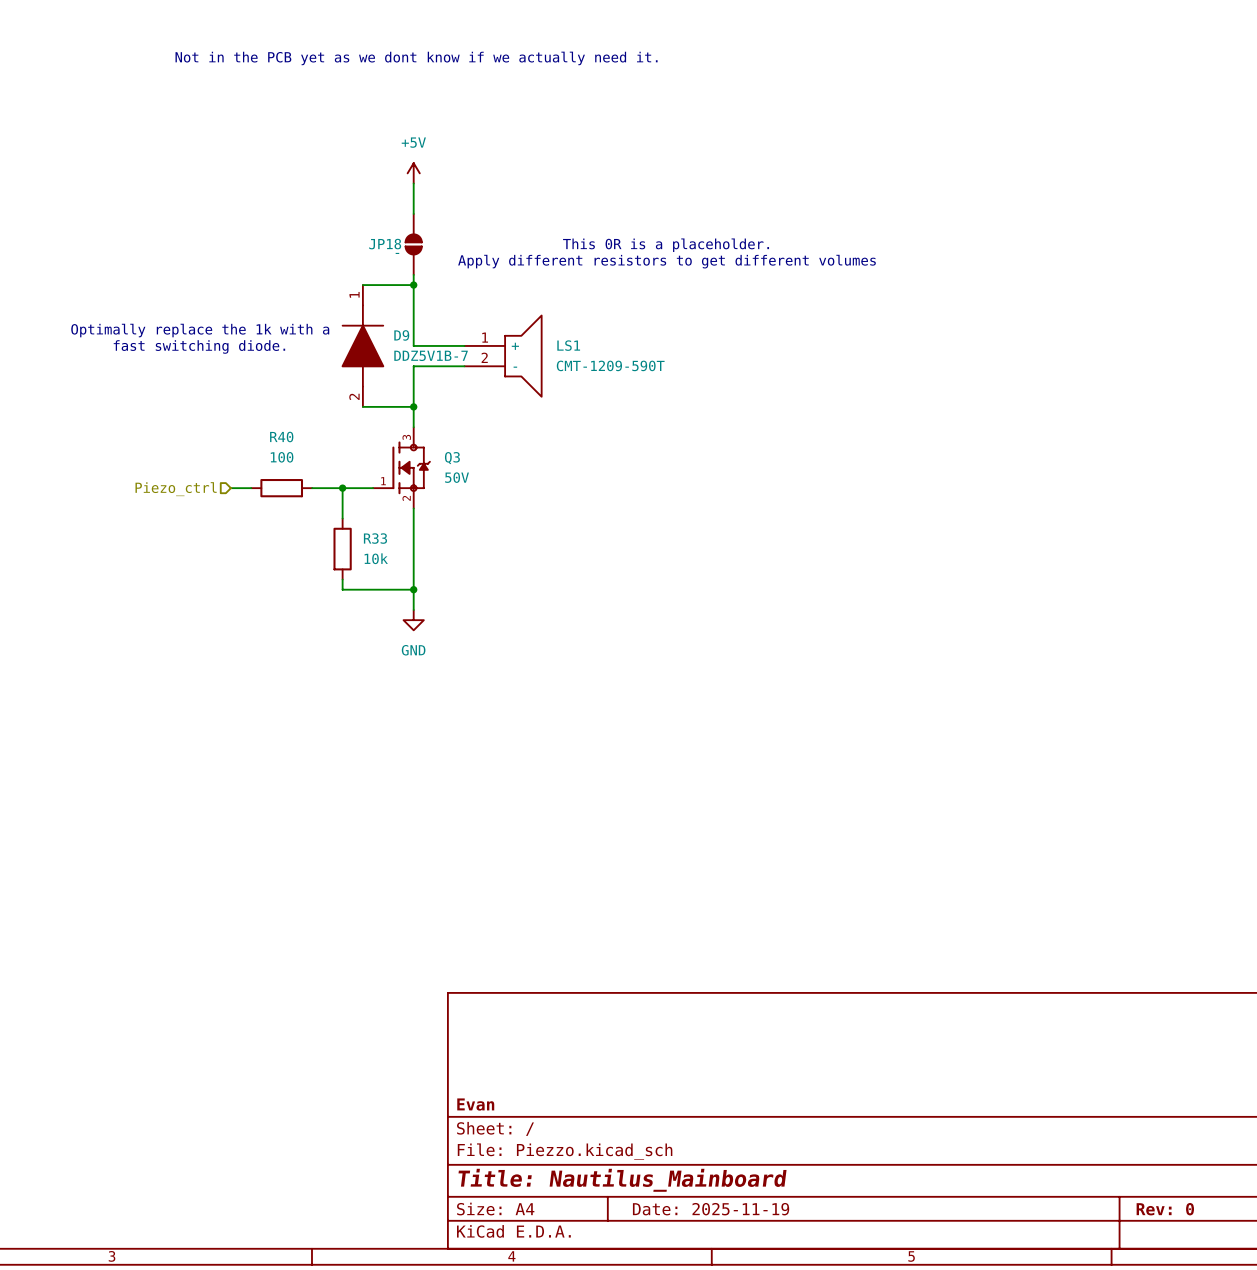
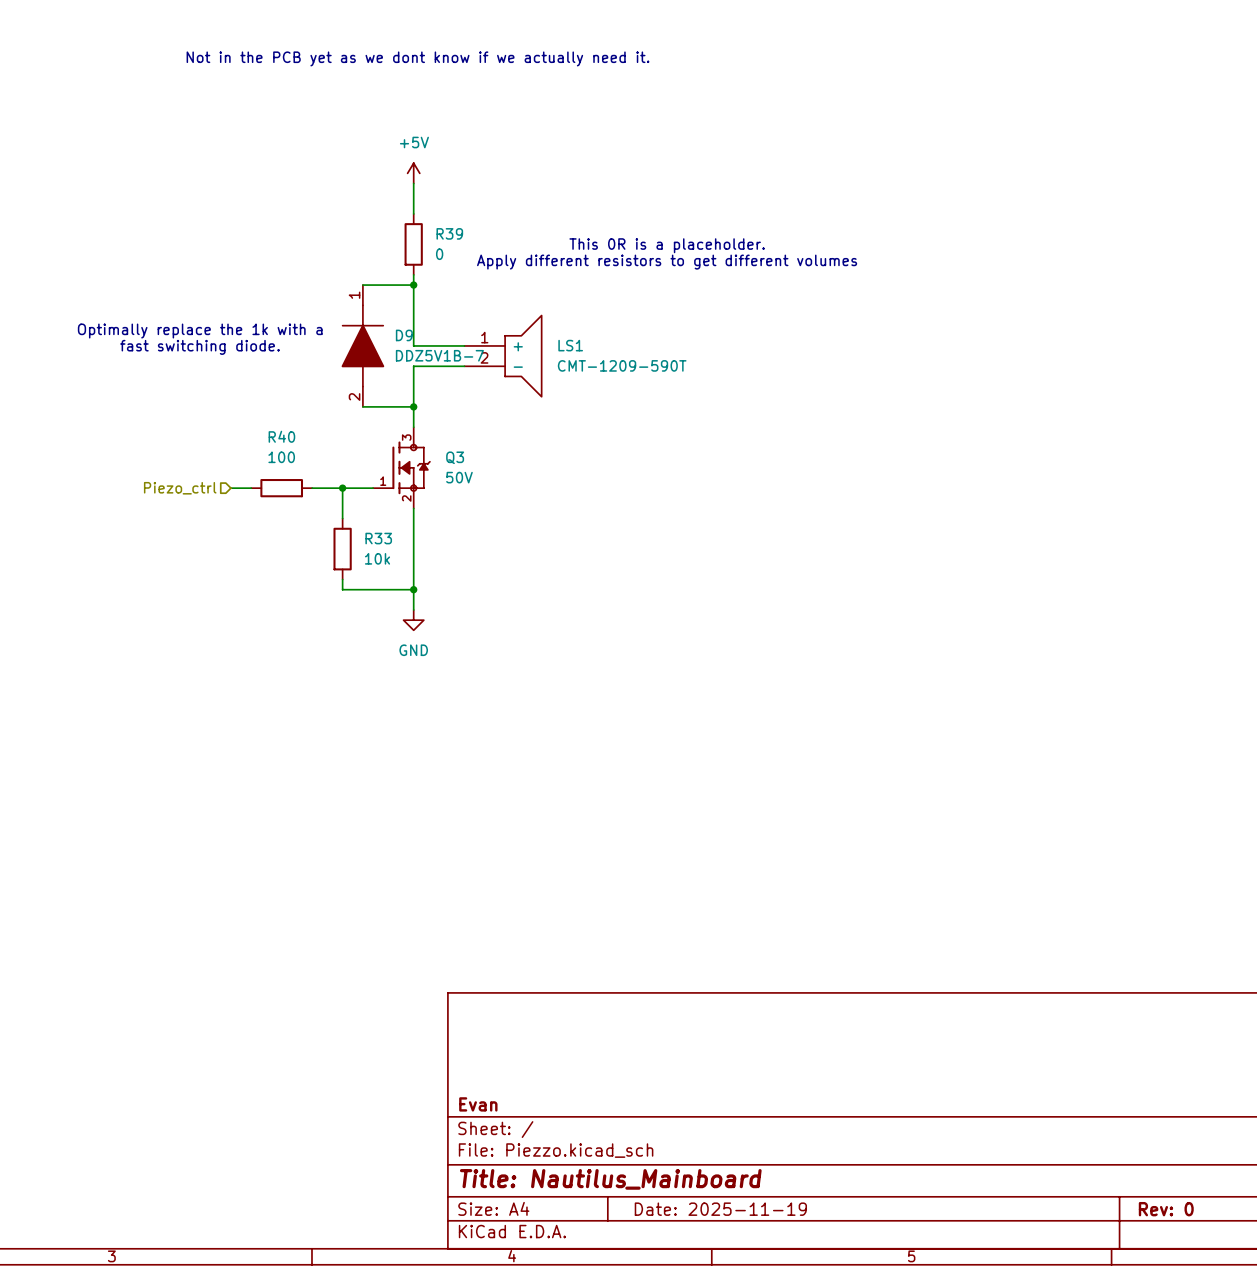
JP18: - (413, 244) -> none
R39: none -> 0 (413, 244)

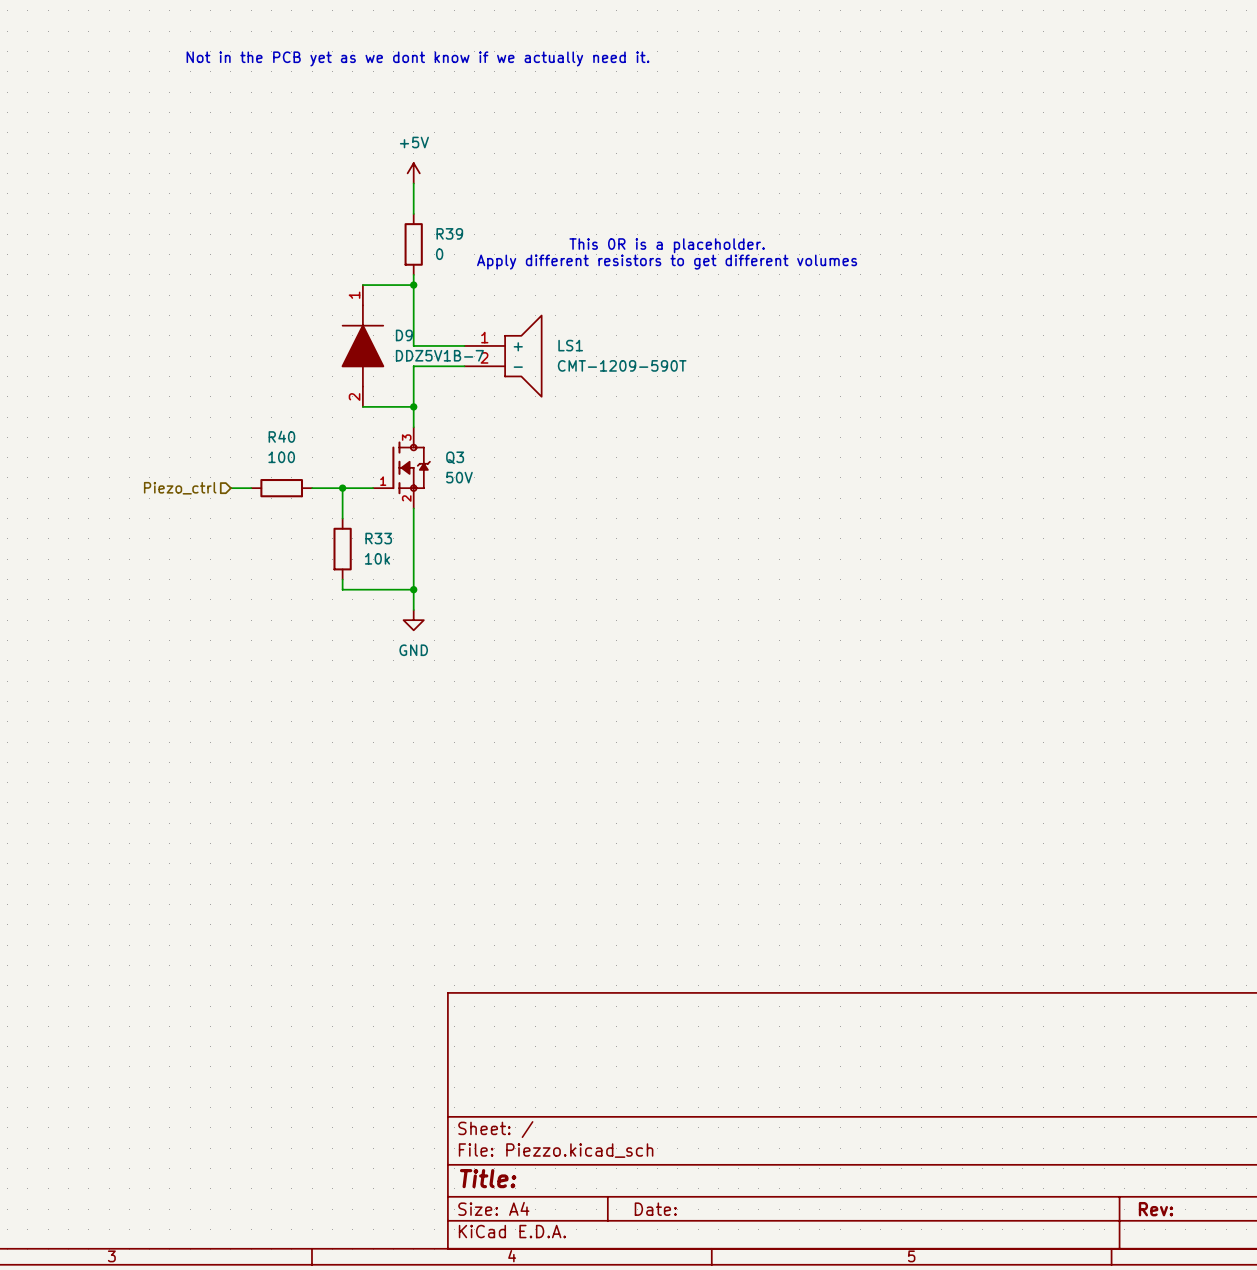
text: Optimally replace the 1k with a (200, 331) -> none
text: fast switching diode. (199, 347) -> none
title block: Evan (478, 1104) -> none
title block: Title: Nautilus_Mainboard (610, 1179) -> Title: (488, 1178)
title block: Date: 2025-11-19 (720, 1209) -> Date: (655, 1209)
title block: Rev: 0 (1166, 1209) -> Rev: (1155, 1209)

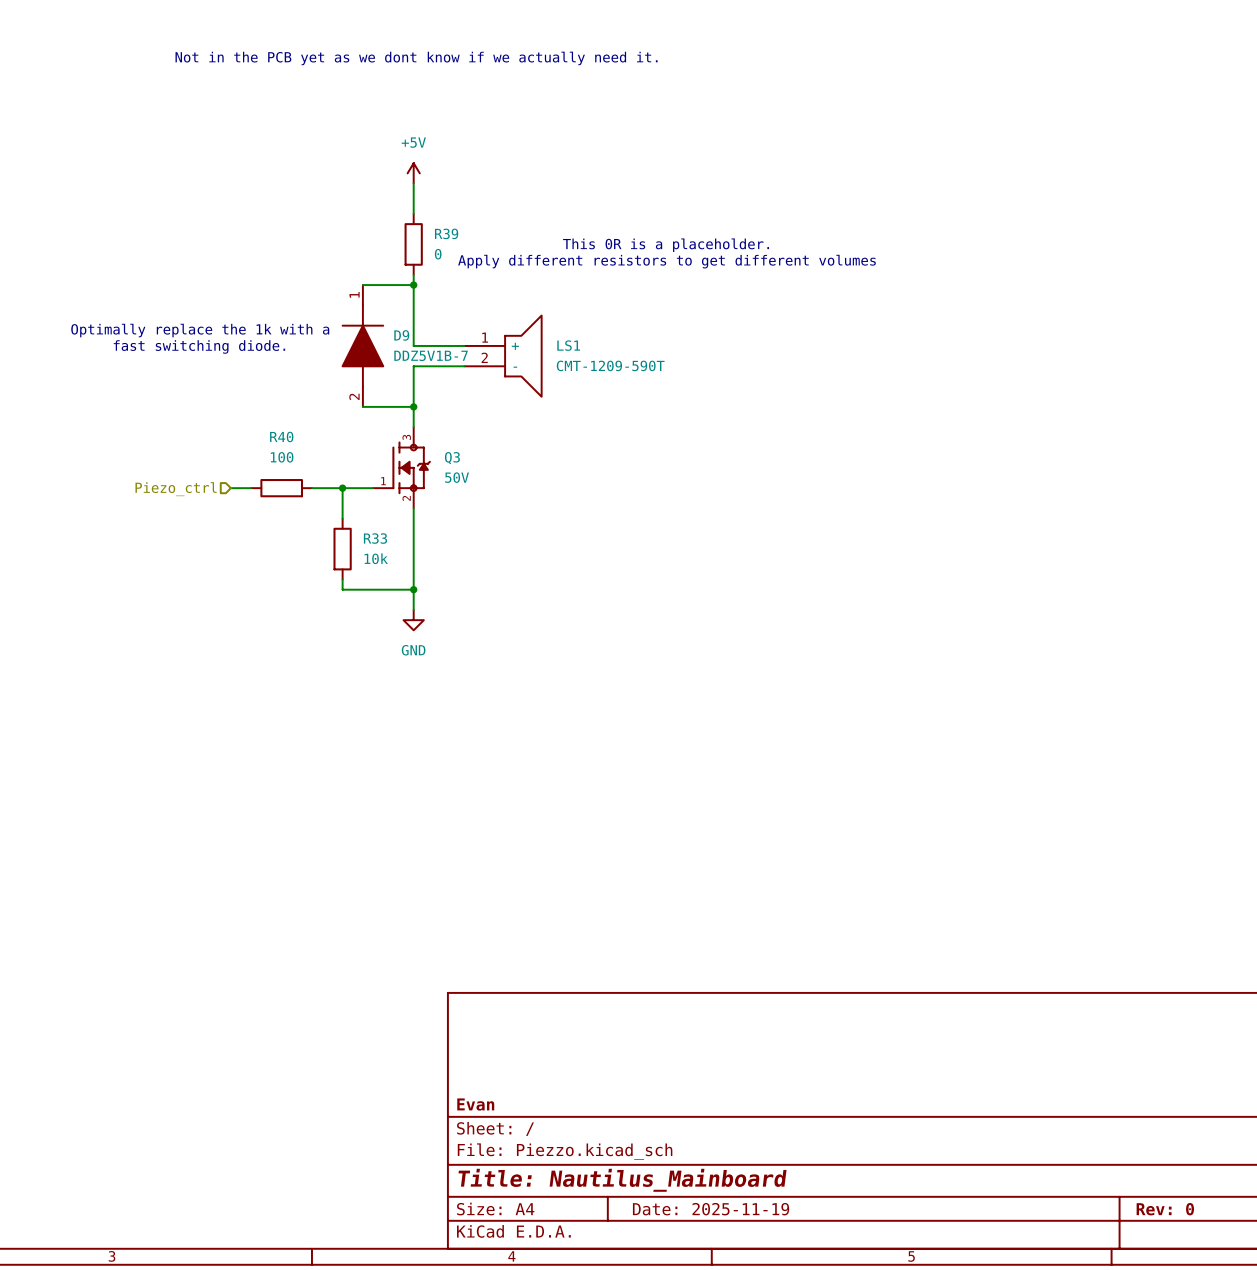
text: none -> Optimally replace the 1k with a (200, 330)
text: none -> fast switching diode. (199, 346)
title block: none -> Evan (475, 1104)
title block: Title: (488, 1178) -> Title: Nautilus_Mainboard (622, 1180)
title block: Date: (655, 1209) -> Date: 2025-11-19 (711, 1209)
title block: Rev: (1155, 1209) -> Rev: 0 (1165, 1209)

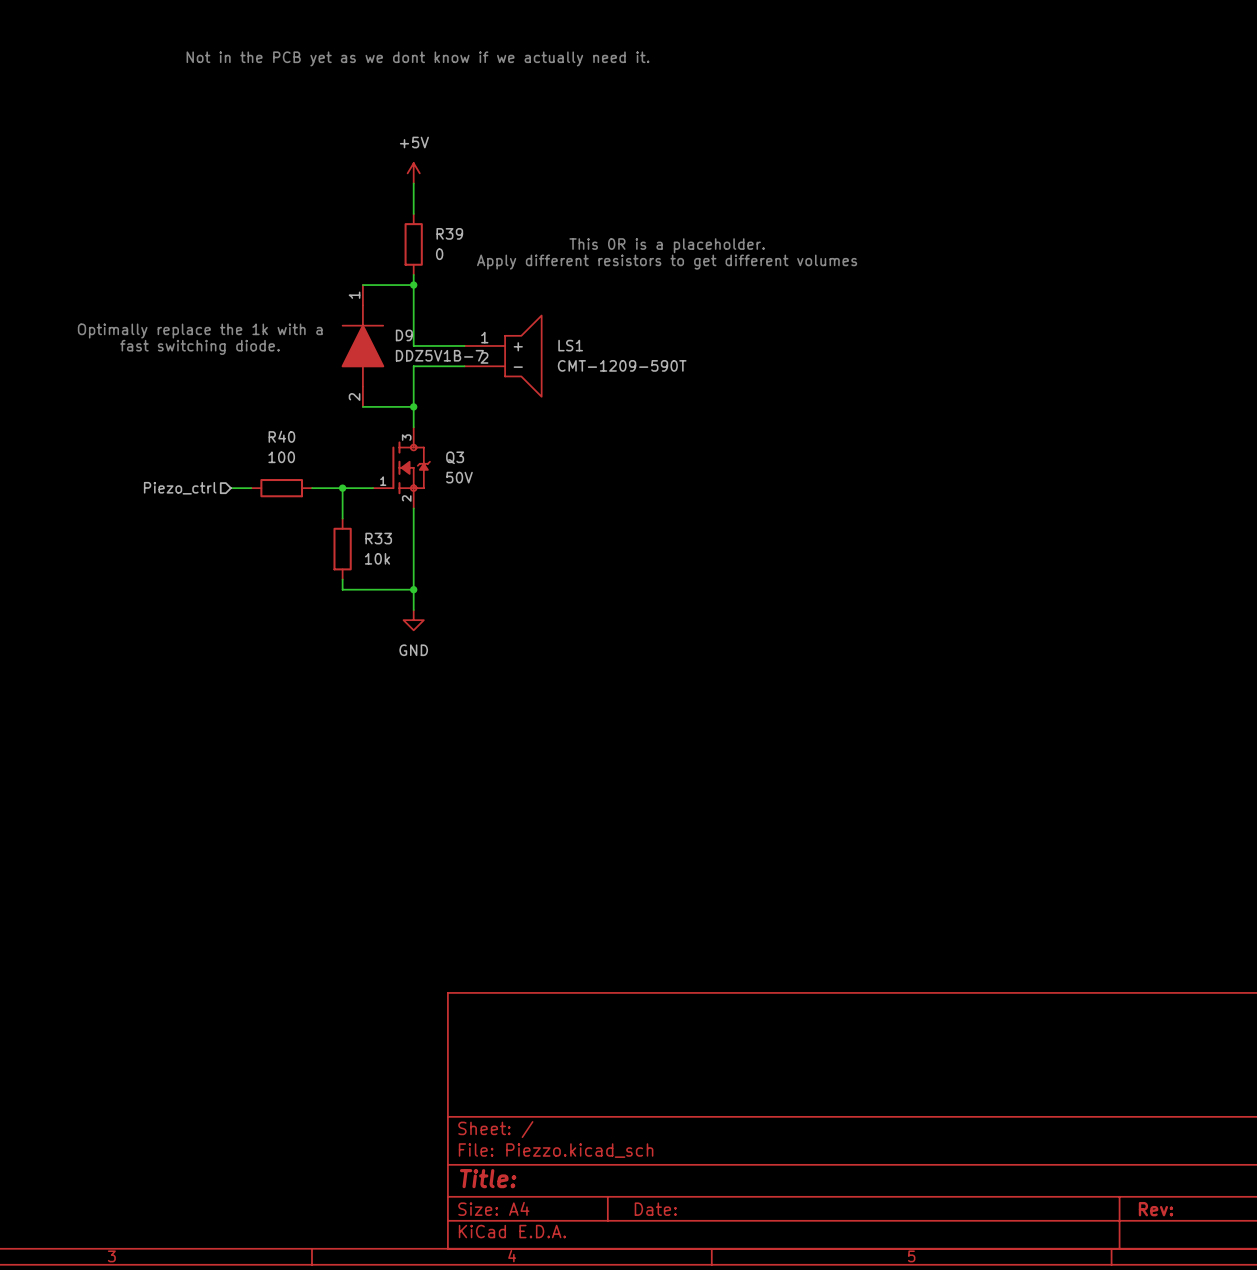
title block: Evan (475, 1104) -> none
title block: Title: Nautilus_Mainboard (622, 1180) -> Title: (488, 1178)
title block: Date: 2025-11-19 (711, 1209) -> Date: (655, 1209)
title block: Rev: 0 (1165, 1209) -> Rev: (1155, 1209)

